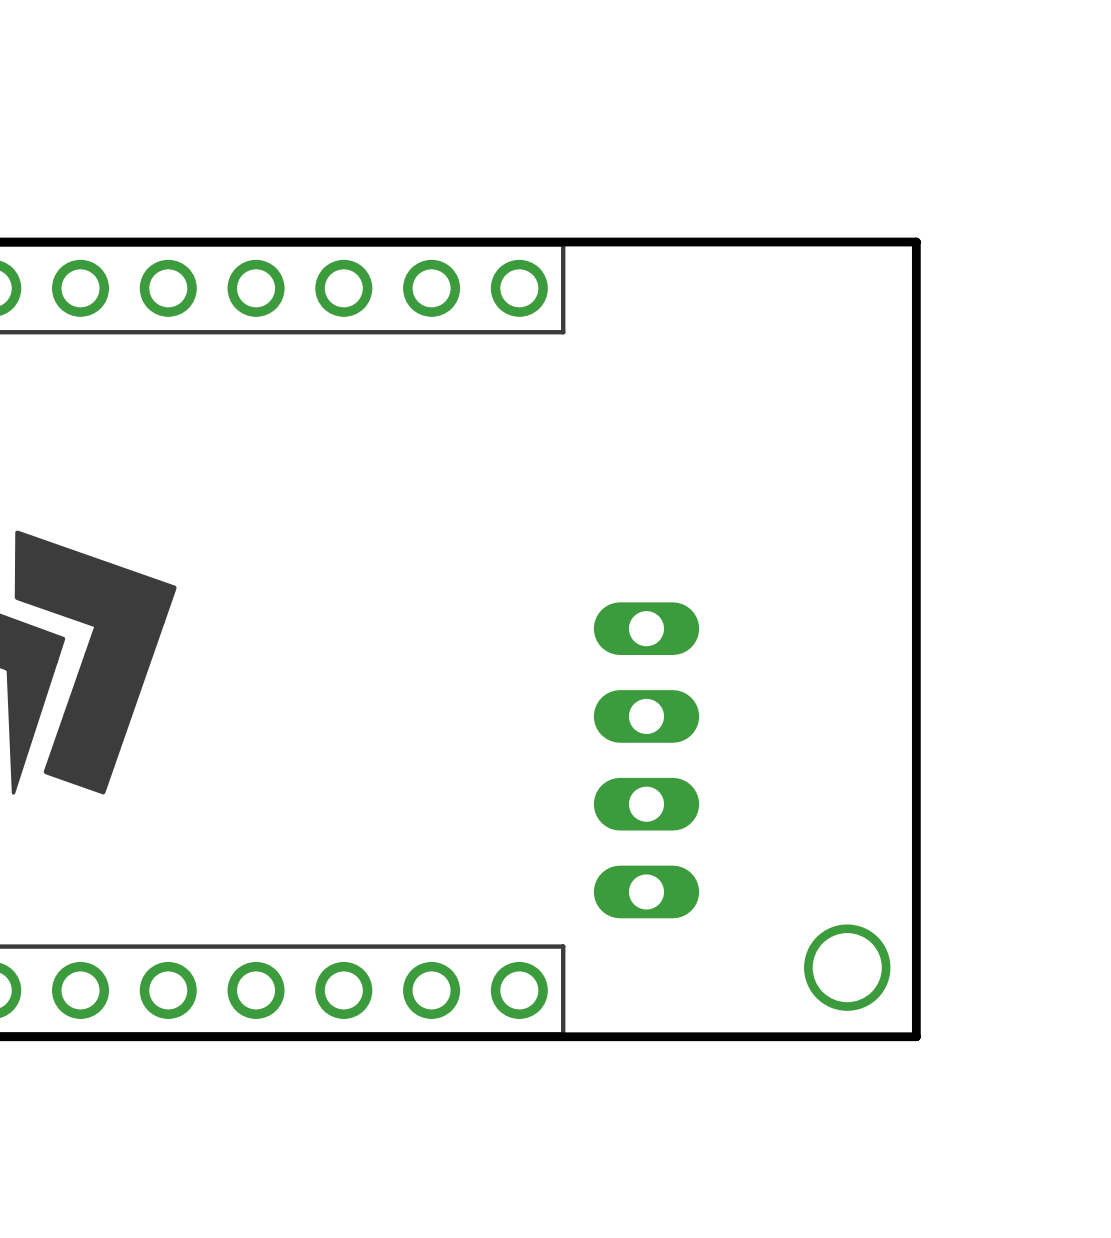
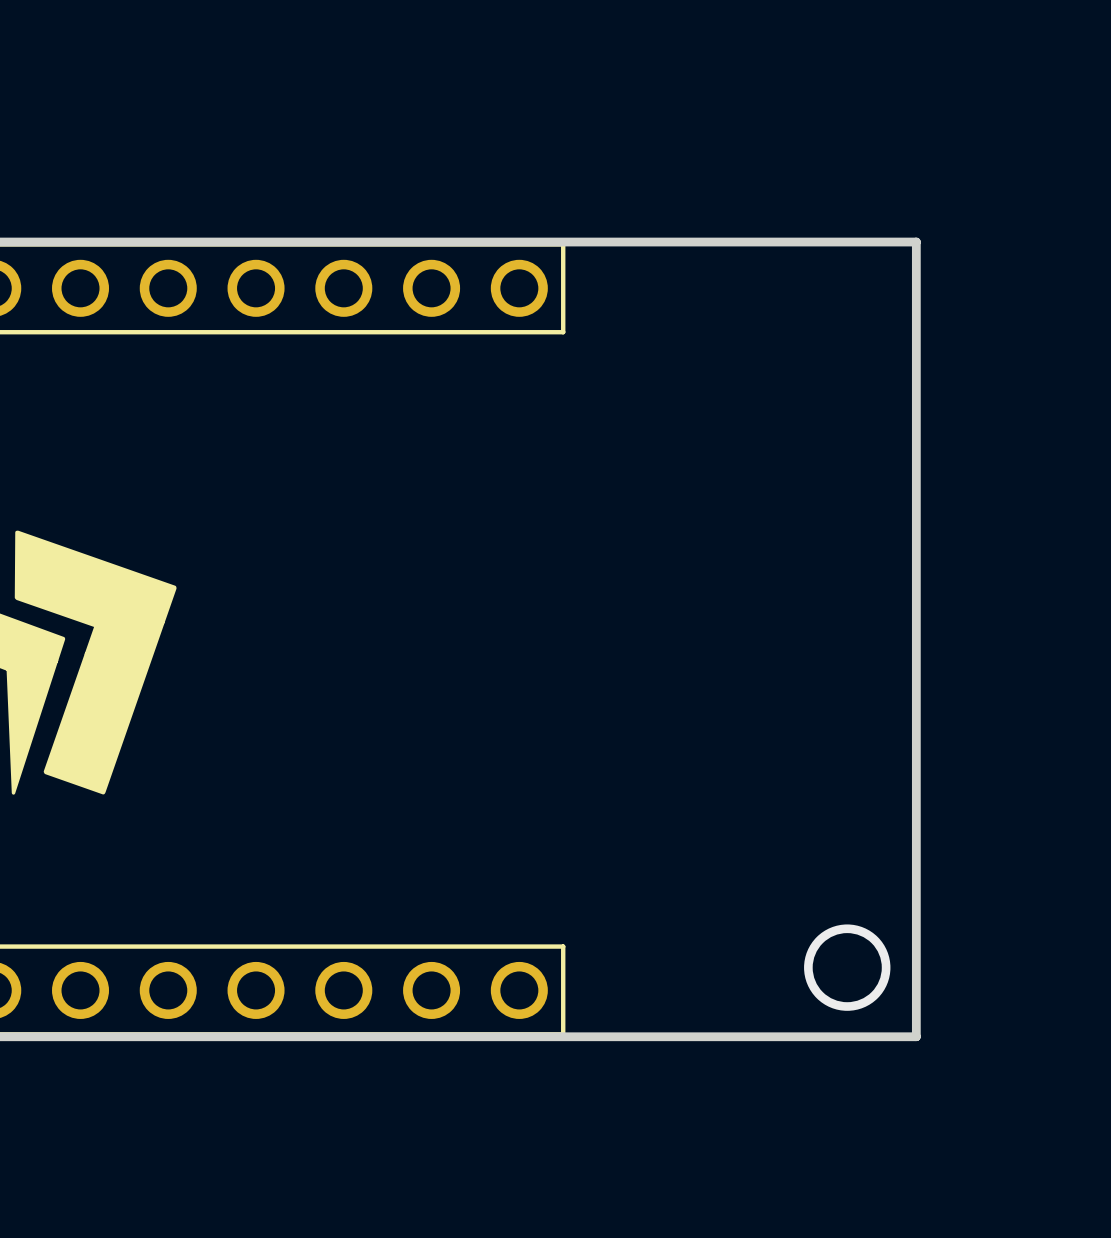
part: (646, 760) -> none

